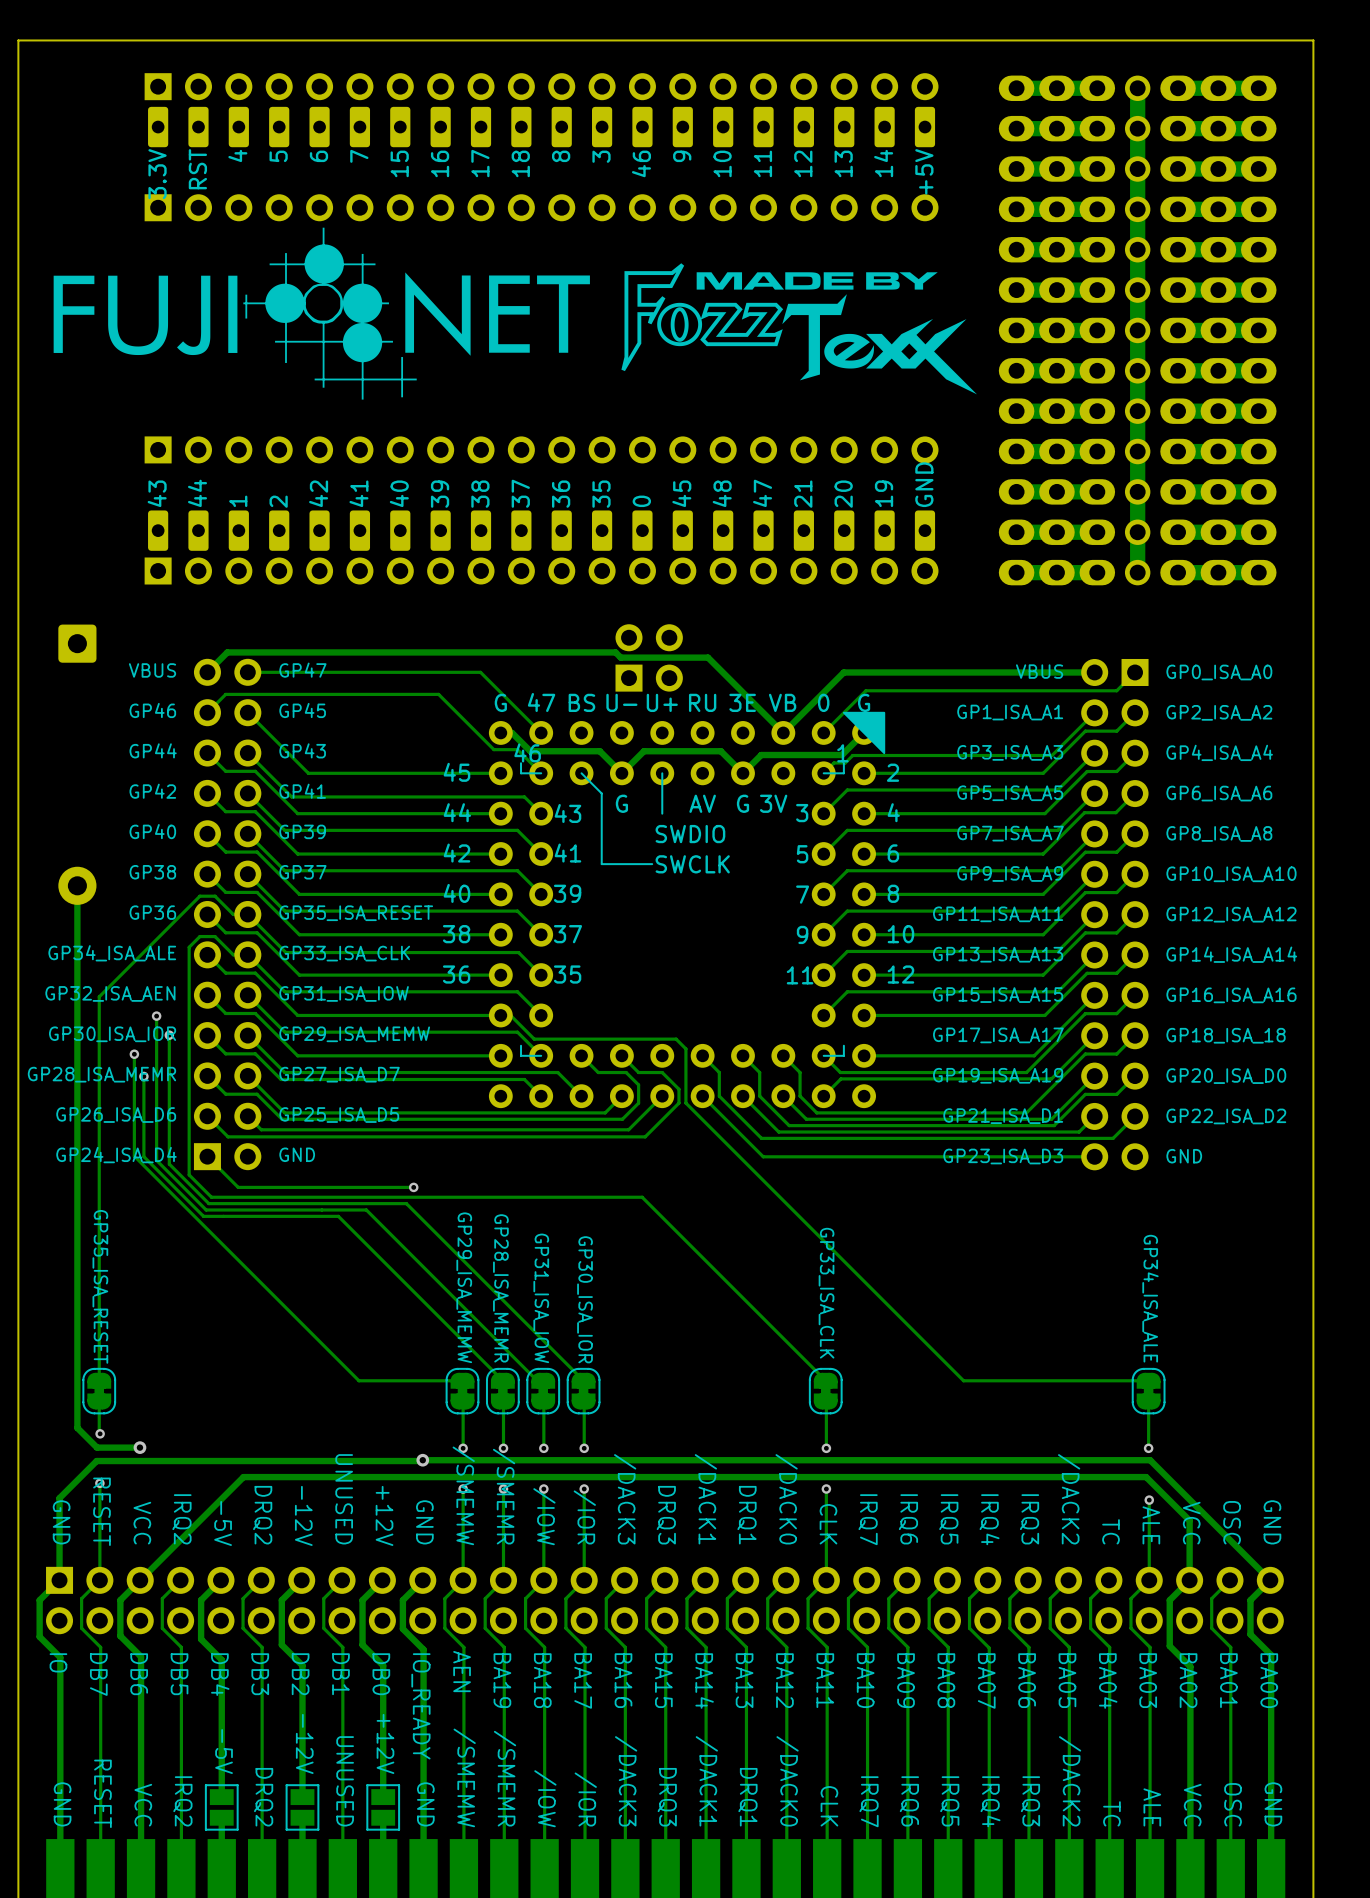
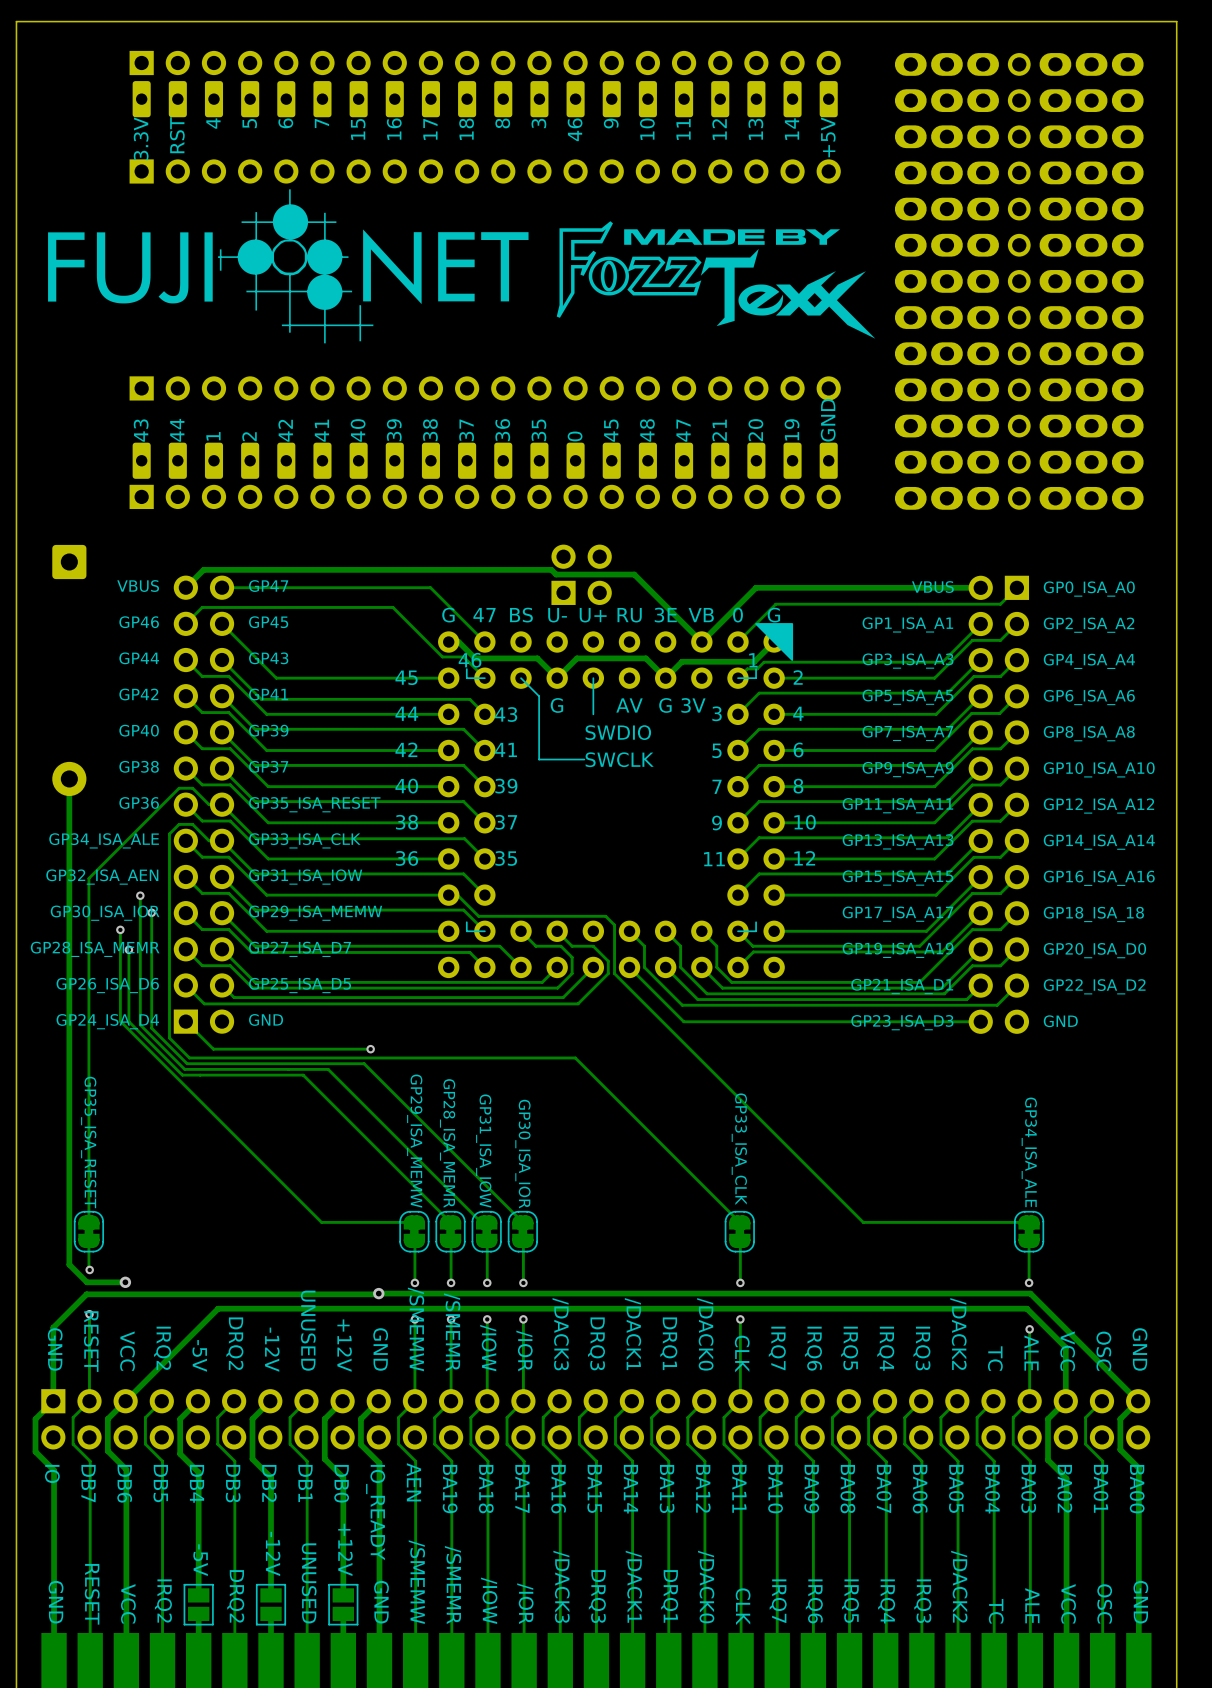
part footprint: [998, 75, 1277, 586] -> [894, 53, 1144, 510]

